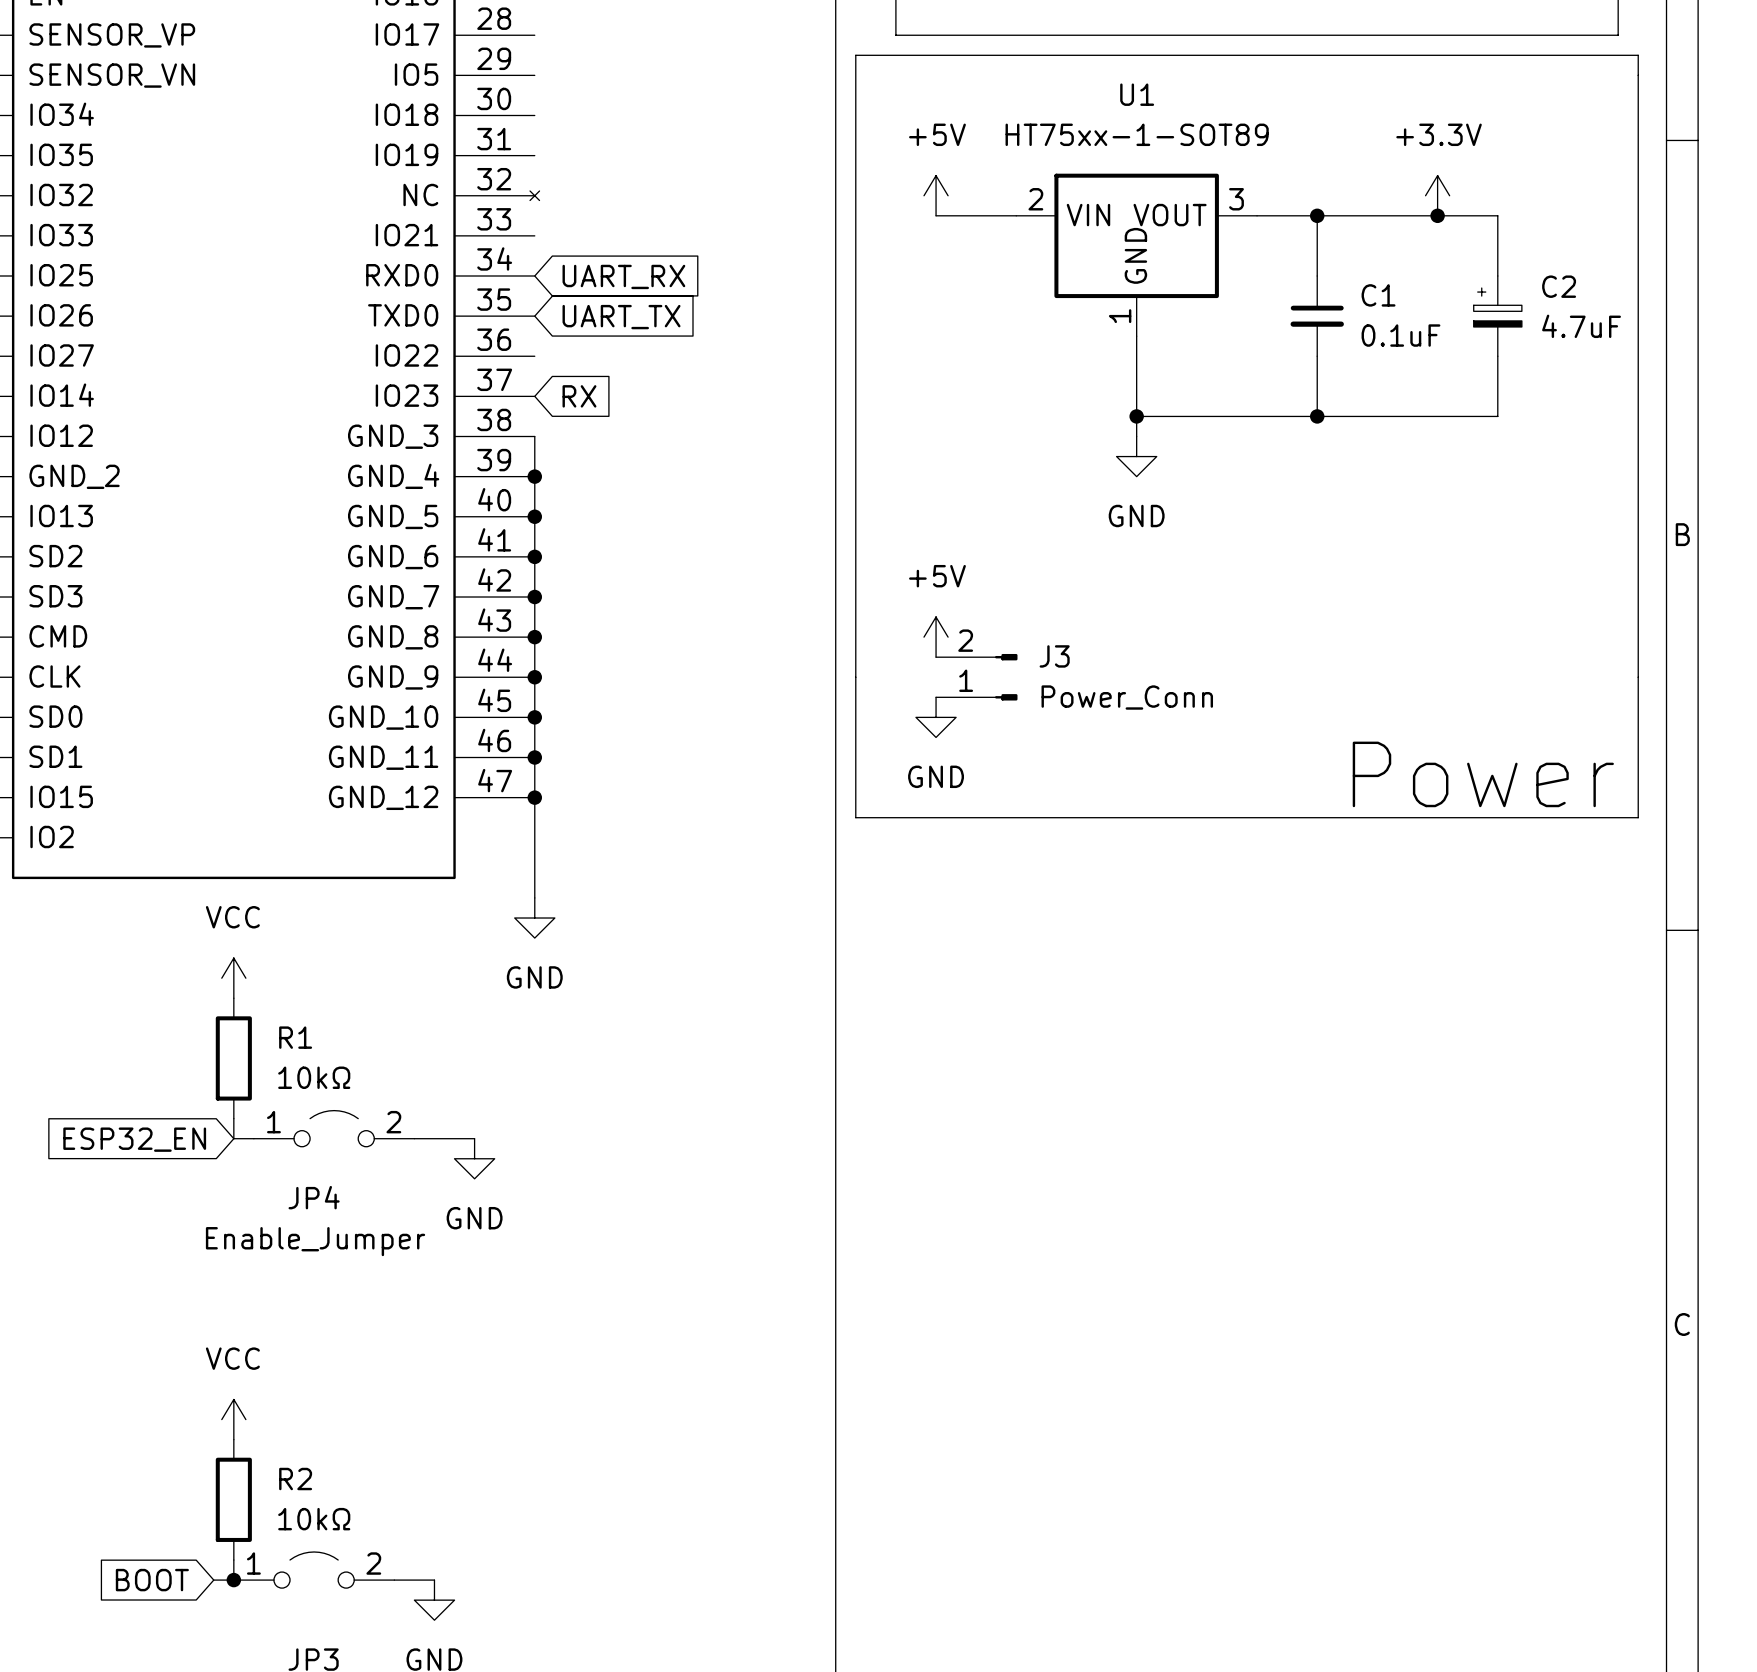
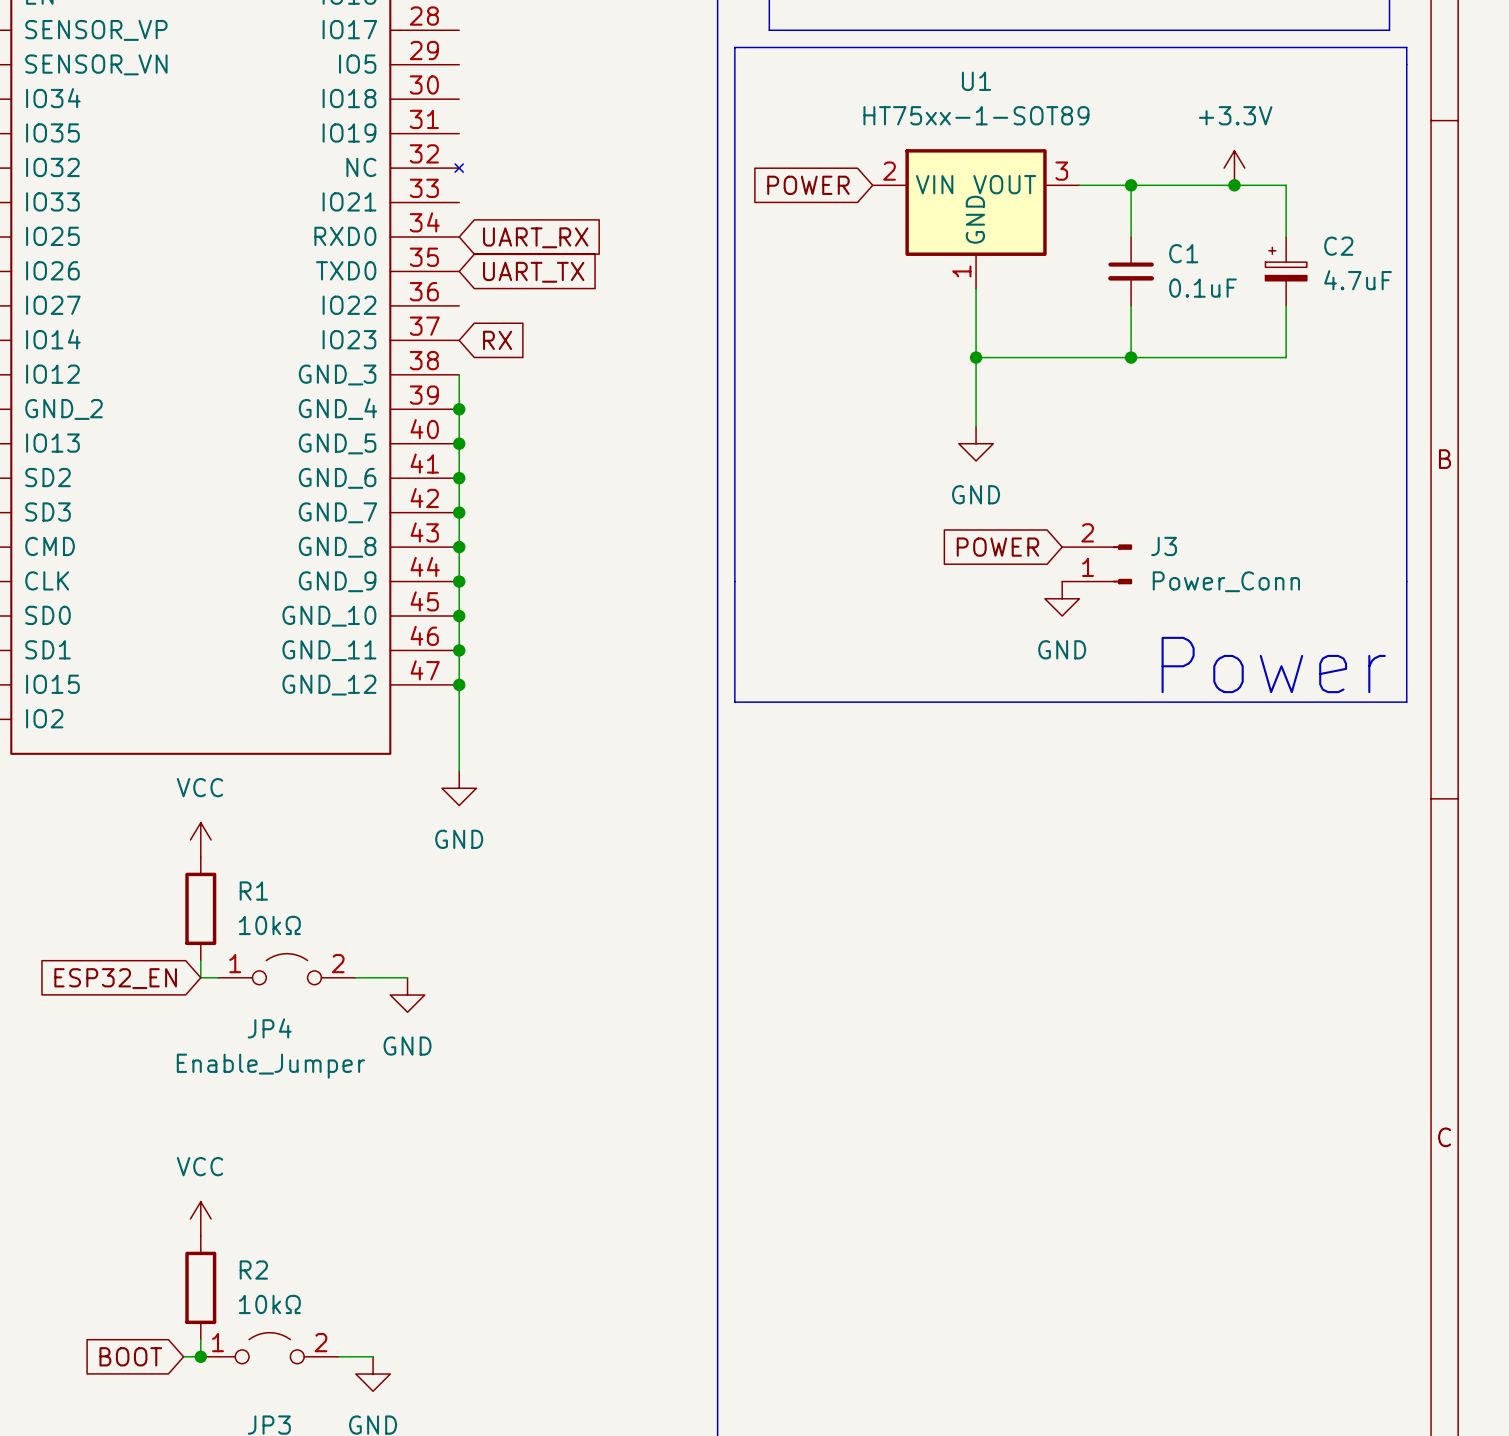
power symbol: +5V (936, 195) -> none
wire: (936, 215) (1016, 215) -> none
global label: none -> POWER (808, 185)
wire: none -> (976, 374) (976, 426)
power symbol position: GND (1136, 456) -> GND (976, 443)
power symbol: +5V (936, 637) -> none
global label: none -> POWER (997, 547)
J3 position: (976, 677) -> (1097, 564)
power symbol: none -> GND (1062, 598)
power symbol: GND (936, 717) -> none

